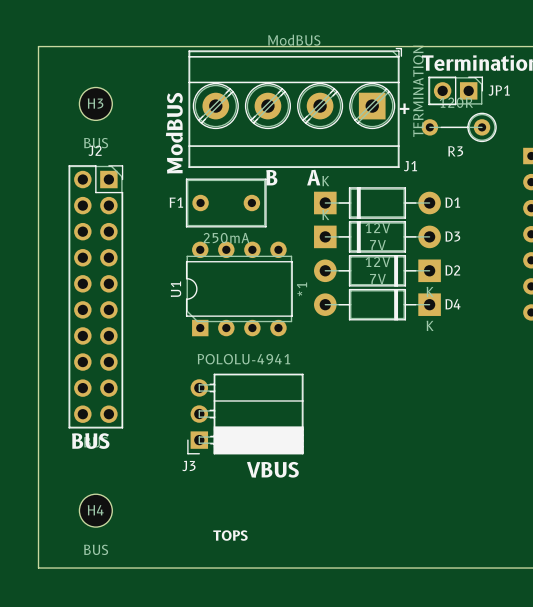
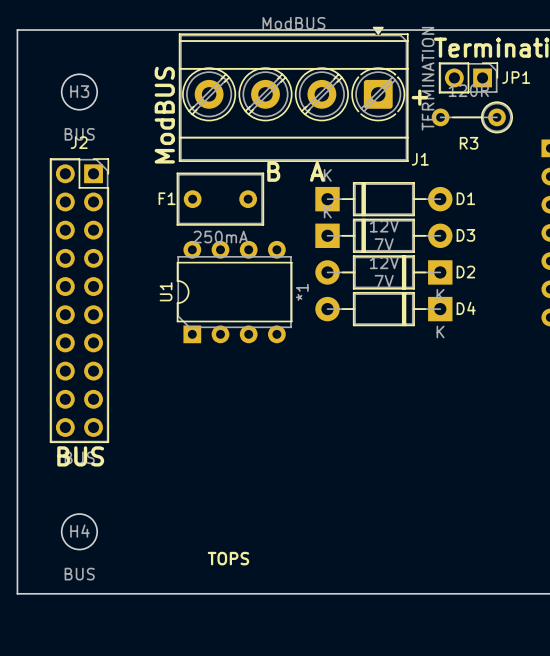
J1 footprint: [188, 47, 403, 168] -> [178, 26, 409, 162]
J3: POLOLU-4941 (245, 414) -> none
text: VBUS (272, 469) -> none

